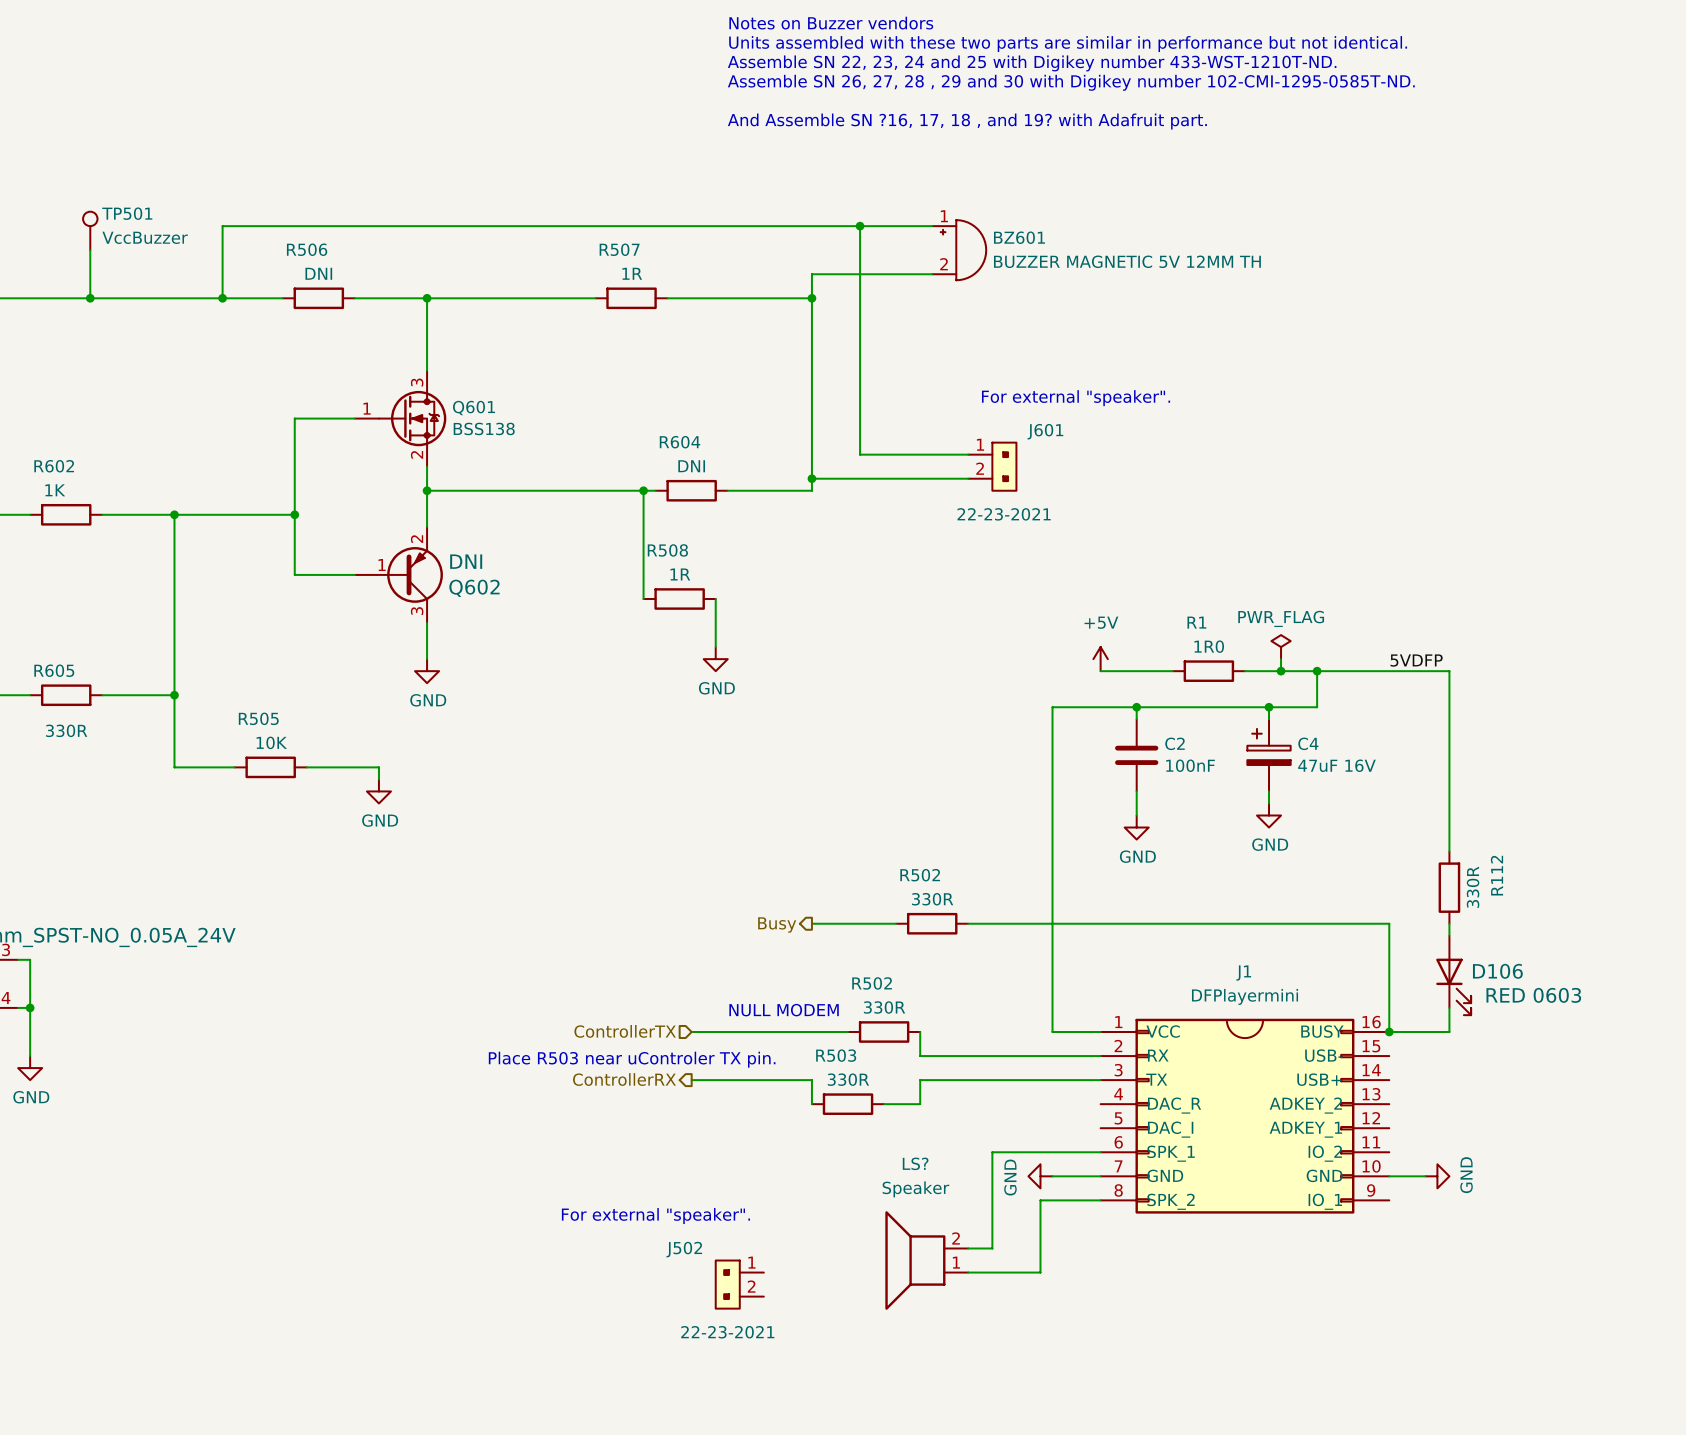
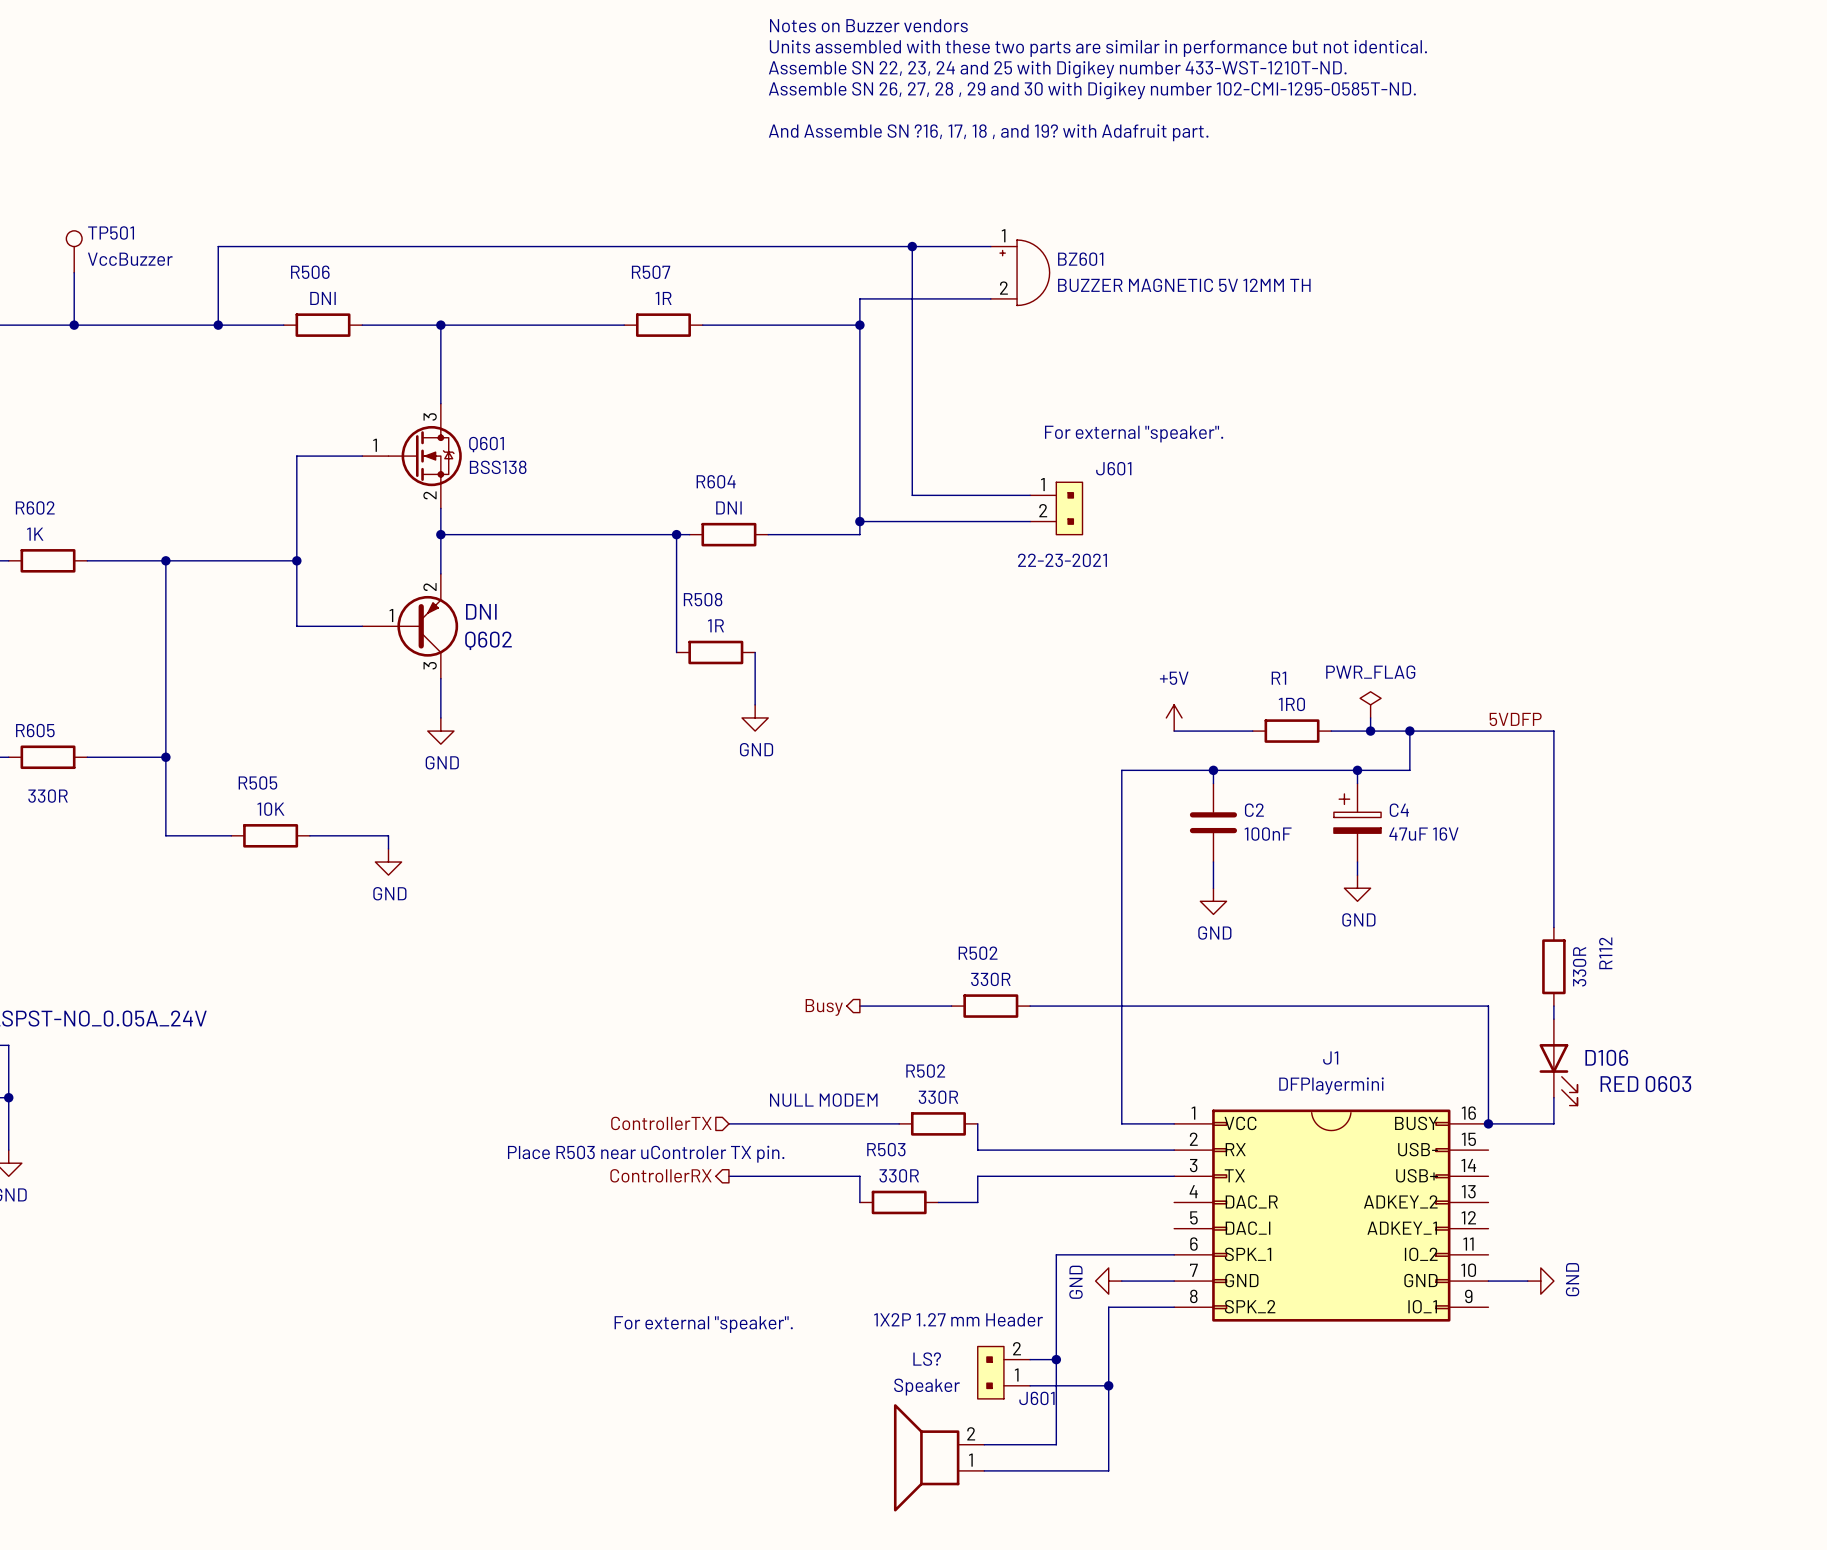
LS? name position: LS? (915, 1163) -> LS? (927, 1359)
LS? value position: Speaker (915, 1189) -> Speaker (927, 1387)
wire: none -> (1056, 1359) (1056, 1444) (984, 1444)
junction: none -> (1056, 1359)
LS? position: (926, 1260) -> (939, 1457)
J601: none -> 1X2P 1.27 mm Header (1003, 1372)
wire: none -> (1108, 1385) (1108, 1470) (984, 1470)
junction: none -> (1108, 1385)
J502: 22-23-2021 (739, 1284) -> none

